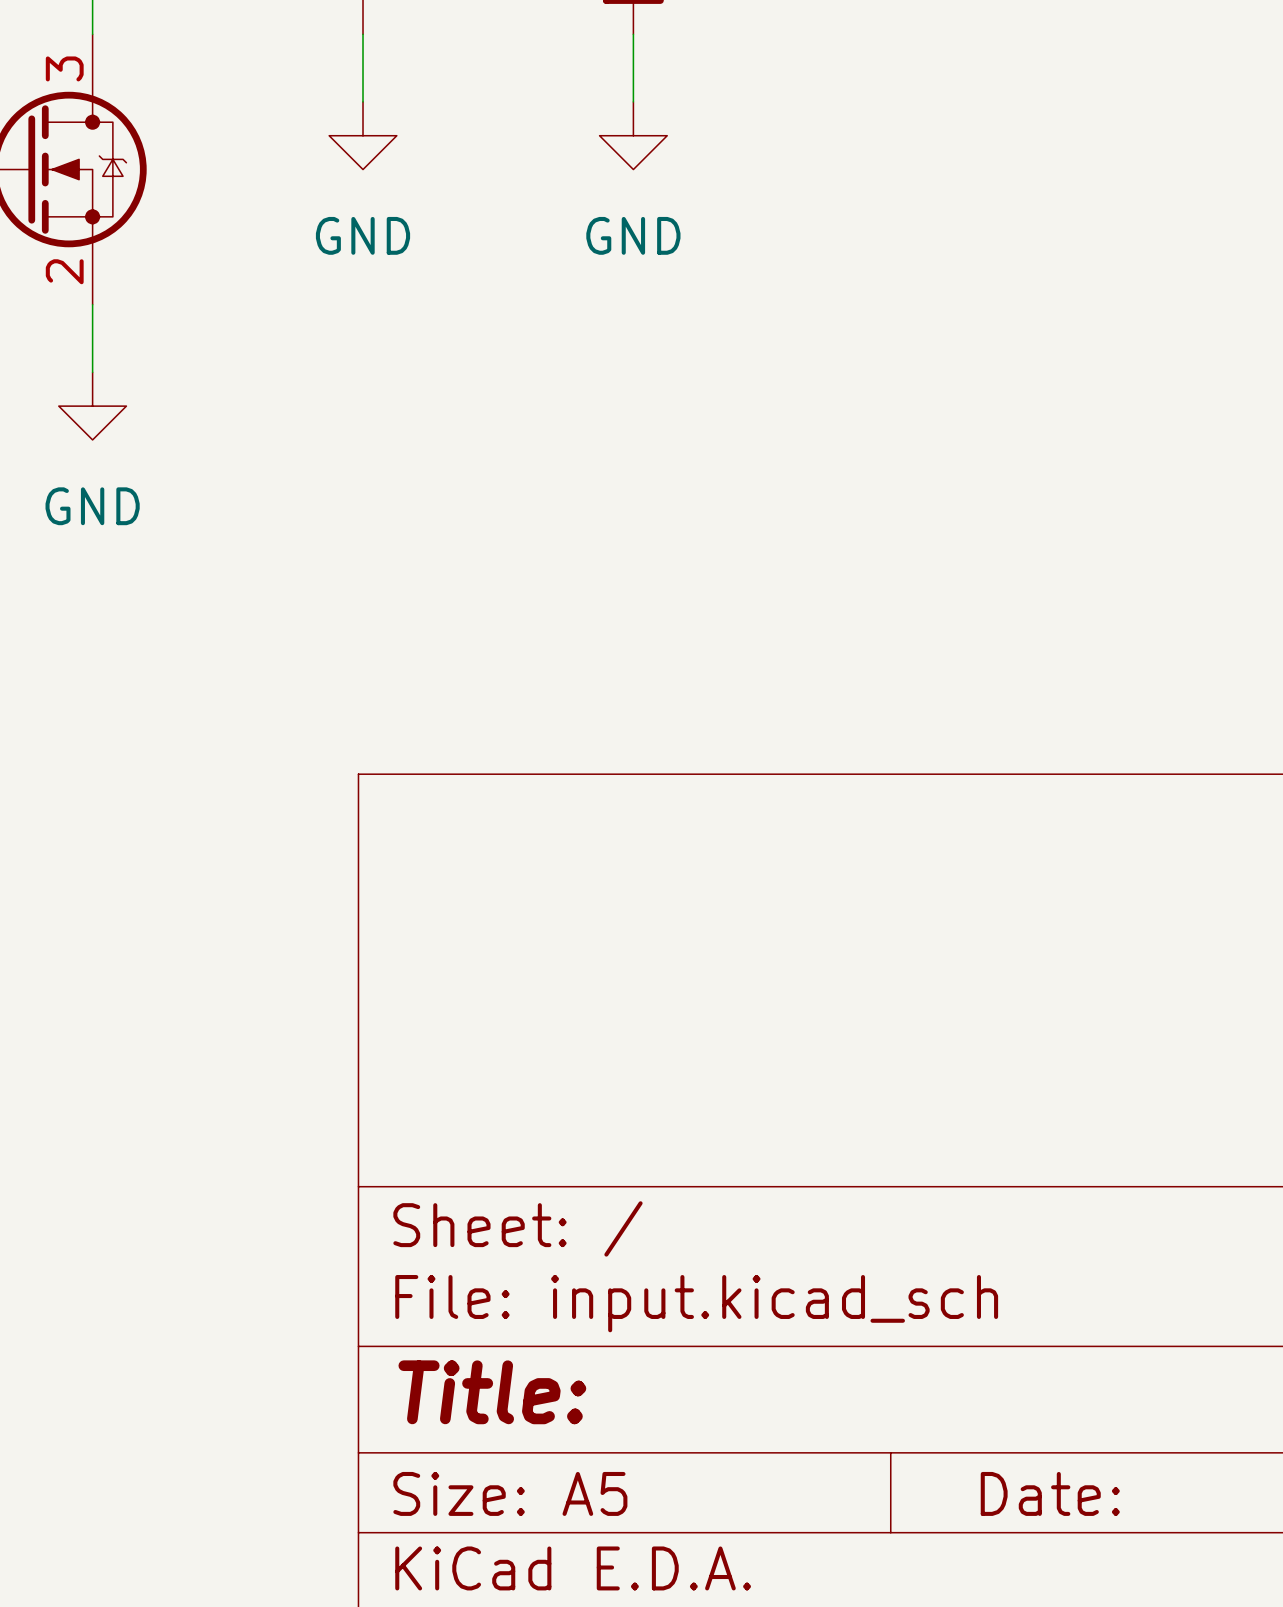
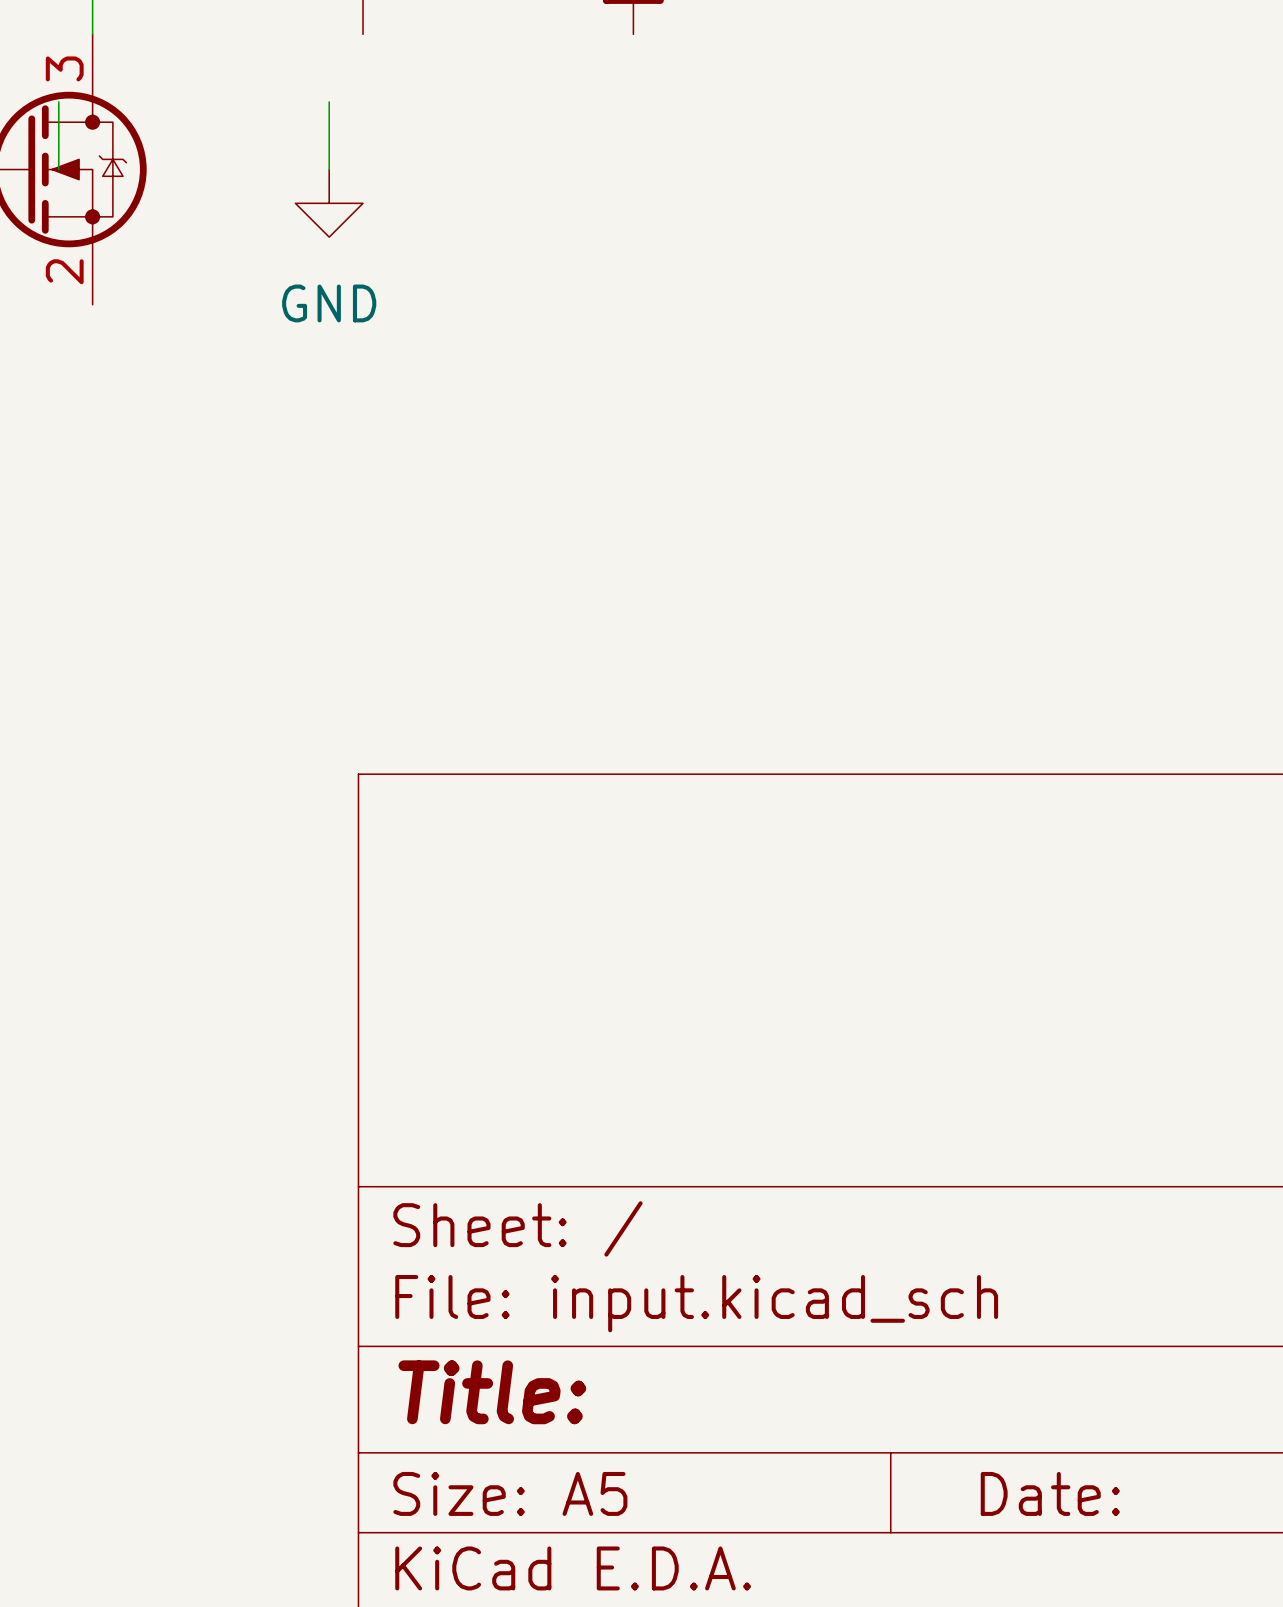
wire: (363, 34) (363, 101) -> (58, 101) (58, 169)
wire: (633, 34) (633, 101) -> (329, 101) (329, 169)
power symbol position: GND (363, 135) -> GND (329, 203)
power symbol: GND (633, 135) -> none
wire: (92, 304) (92, 372) -> none
power symbol: GND (92, 406) -> none

